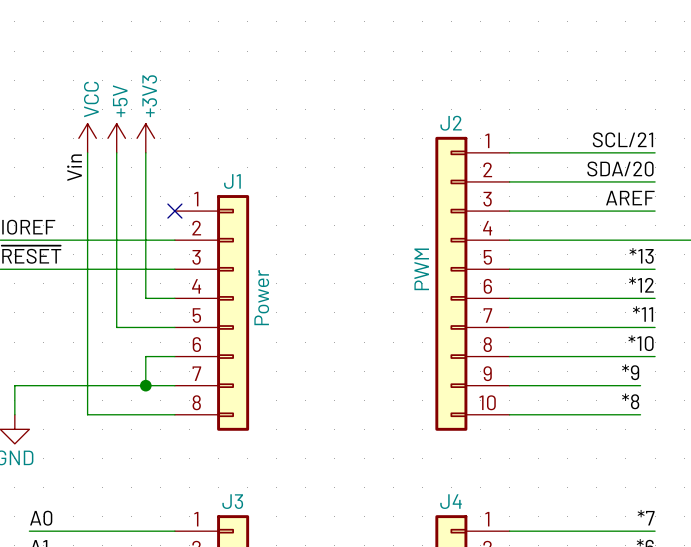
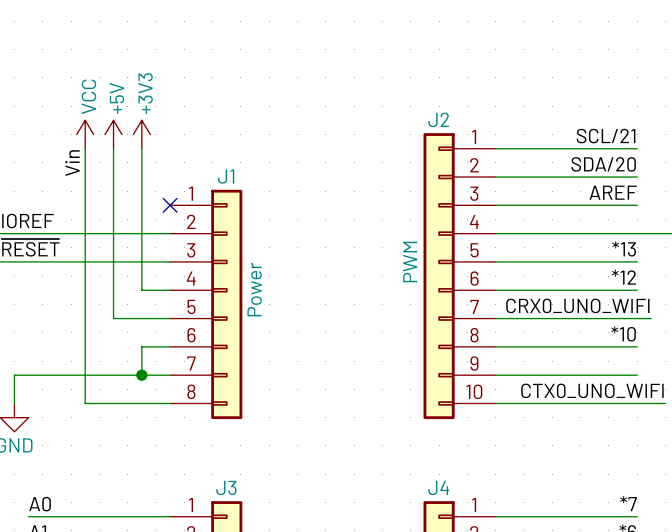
label: *11 (643, 313) -> none
label: none -> CRX0_UNO_WIFI (577, 305)
wire: none -> (637, 318) (651, 318)
label: *9 (630, 372) -> none
wire: none -> (623, 375) (637, 375)
label: none -> CTX0_UNO_WIFI (592, 390)
label: *8 (630, 401) -> none
wire: none -> (623, 403) (665, 403)

